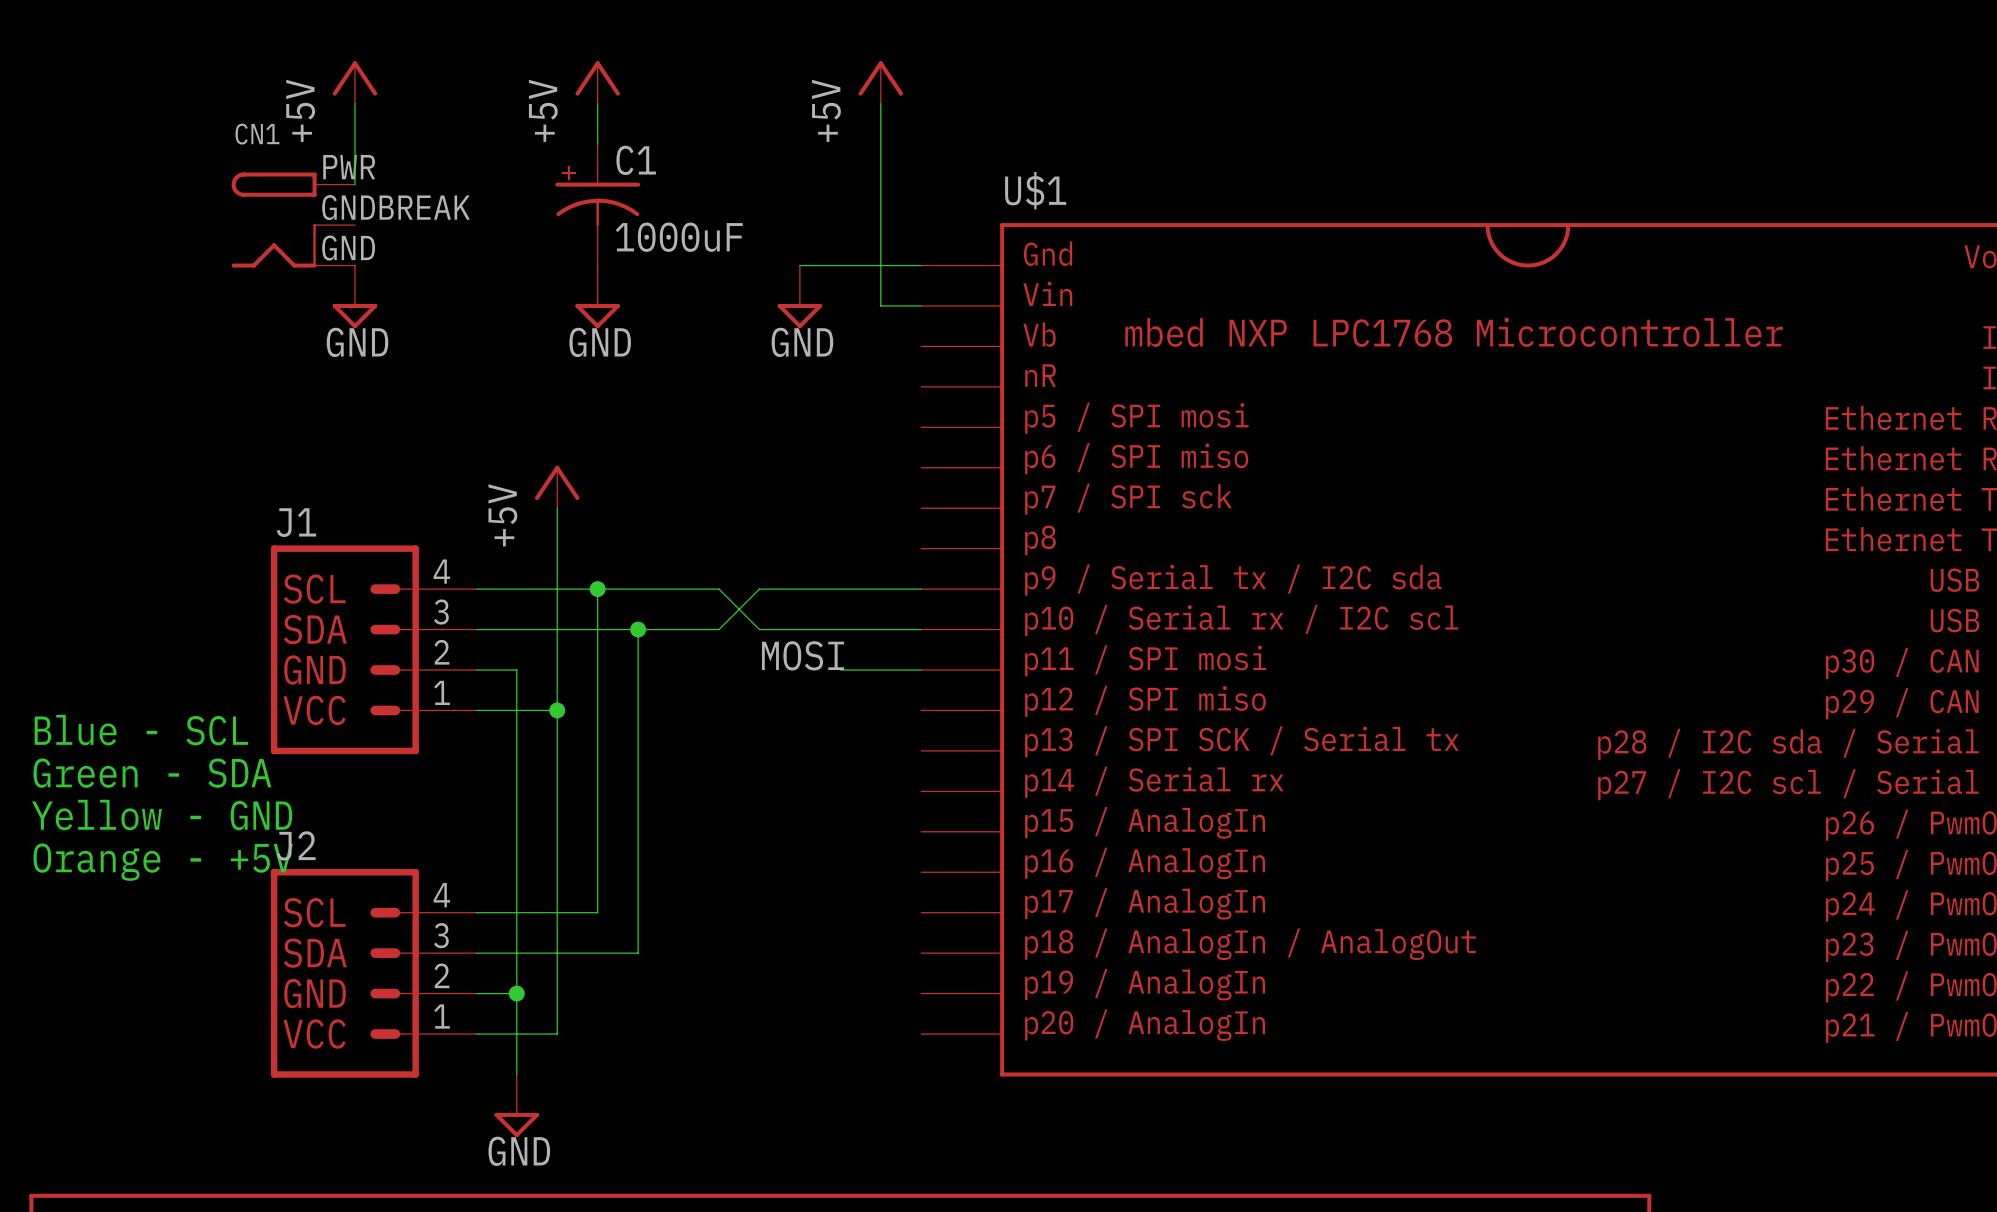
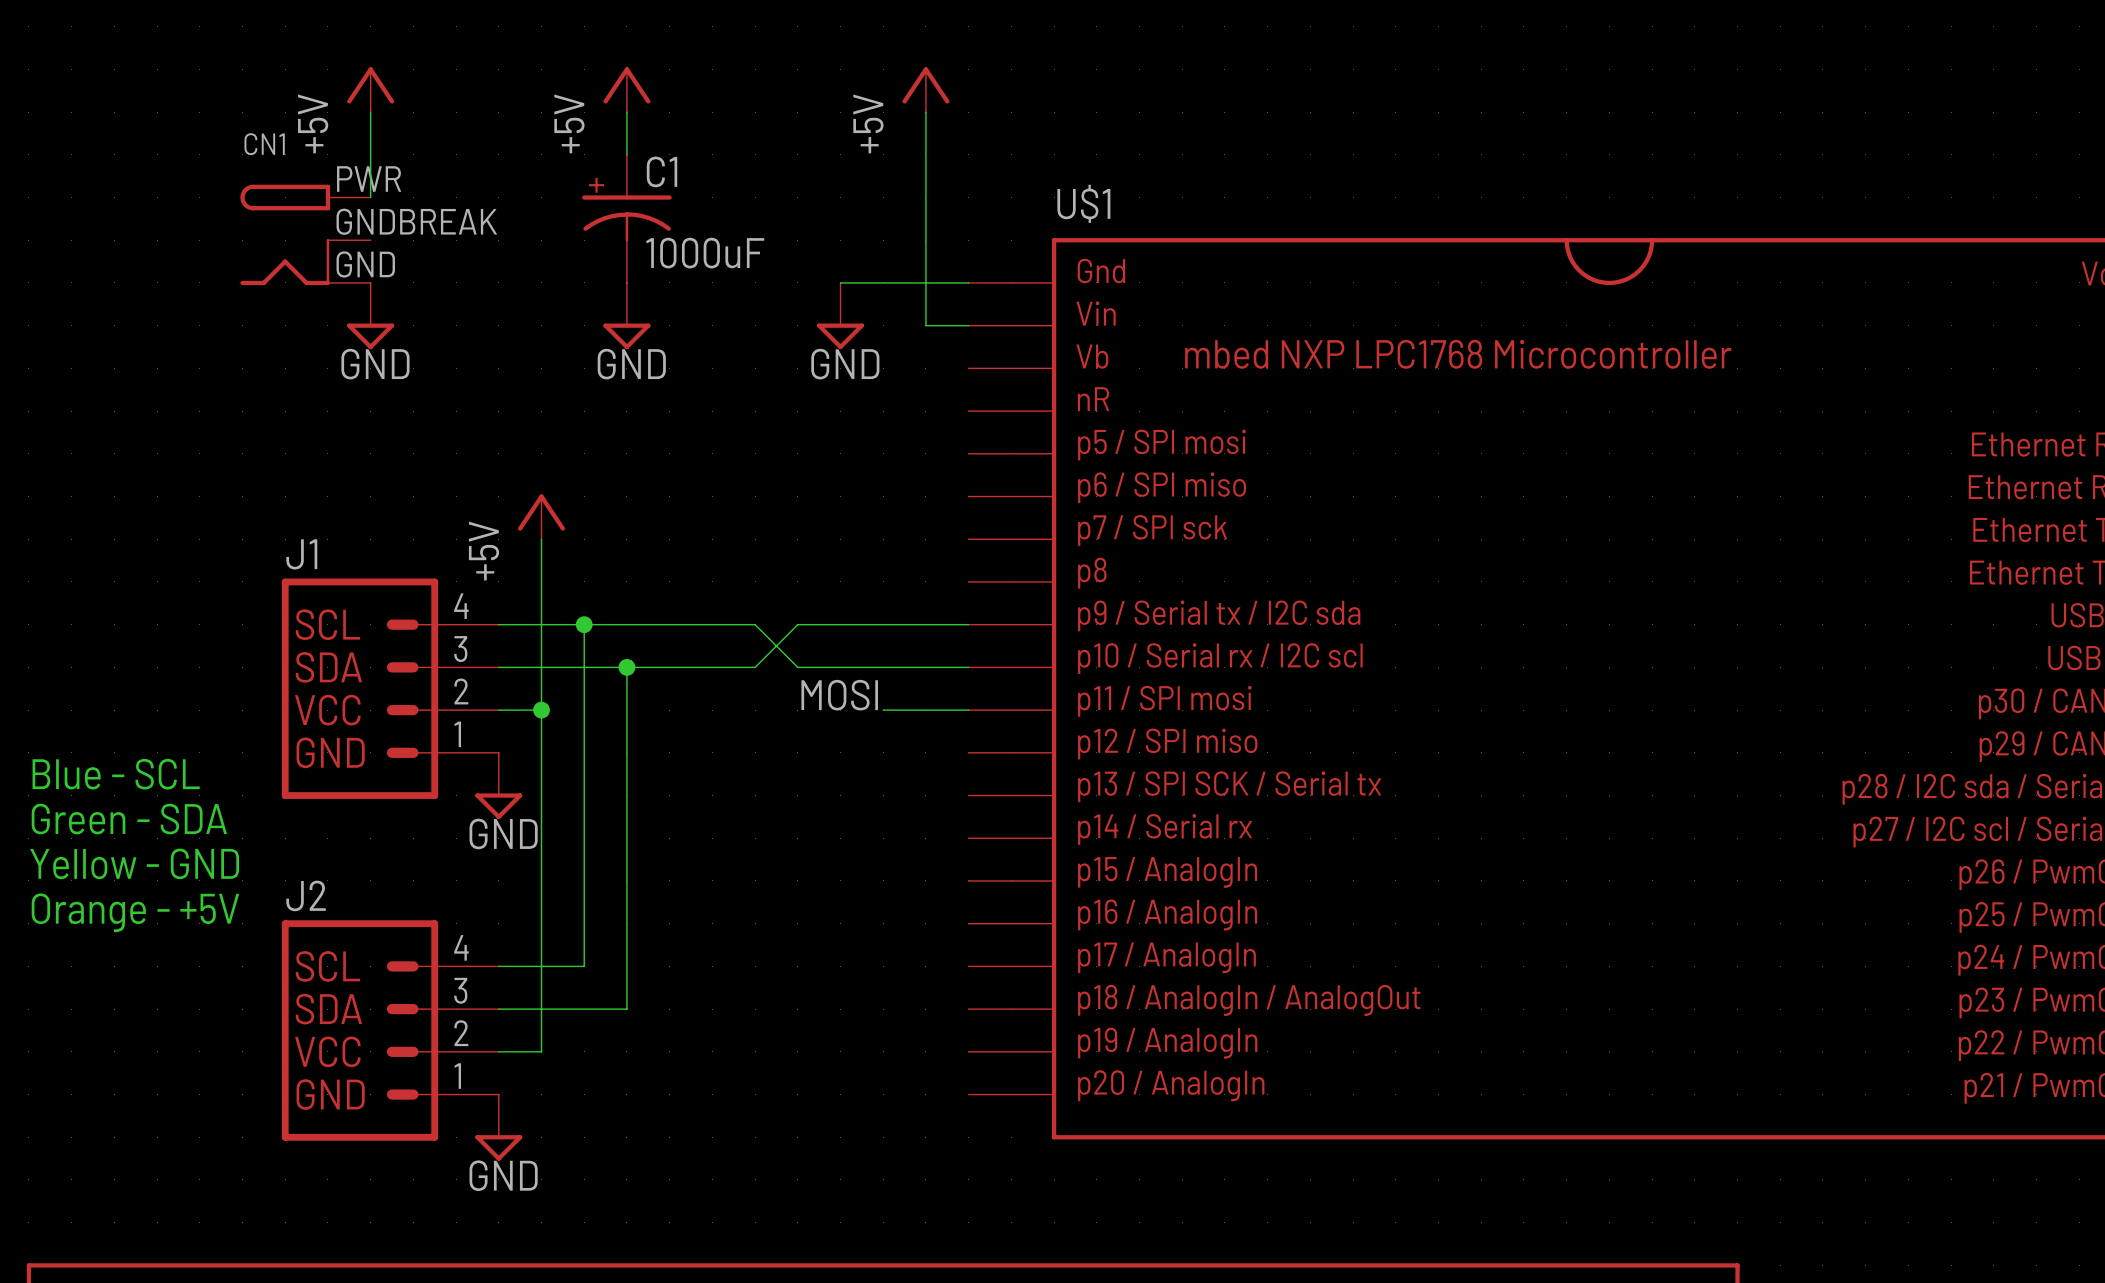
power symbol position: +5V (557, 486) -> +5V (541, 516)
wire: none -> (541, 539) (541, 710)
wire: (557, 508) (557, 589) -> none
junction: none -> (584, 624)
wire: (597, 589) (597, 629) -> none
junction: (597, 589) -> none
junction: none -> (626, 667)
wire: (638, 629) (638, 953) (597, 953) -> none
junction: (638, 629) -> none
J1 text: GND (315, 670) -> VCC (327, 710)
junction: none -> (541, 710)
J1 text: VCC (314, 710) -> GND (330, 752)
wire: (476, 710) (557, 710) -> none
junction: (557, 710) -> none
power symbol: none -> GND (498, 785)
wire: (597, 912) (557, 912) (557, 1034) (476, 1034) -> (626, 966) (626, 1009)
J2 text: GND (315, 993) -> VCC (327, 1051)
wire: (516, 993) (516, 1074) -> none
junction: (516, 993) -> none
J2 text: VCC (314, 1034) -> GND (330, 1094)
power symbol position: GND (516, 1105) -> GND (498, 1127)

